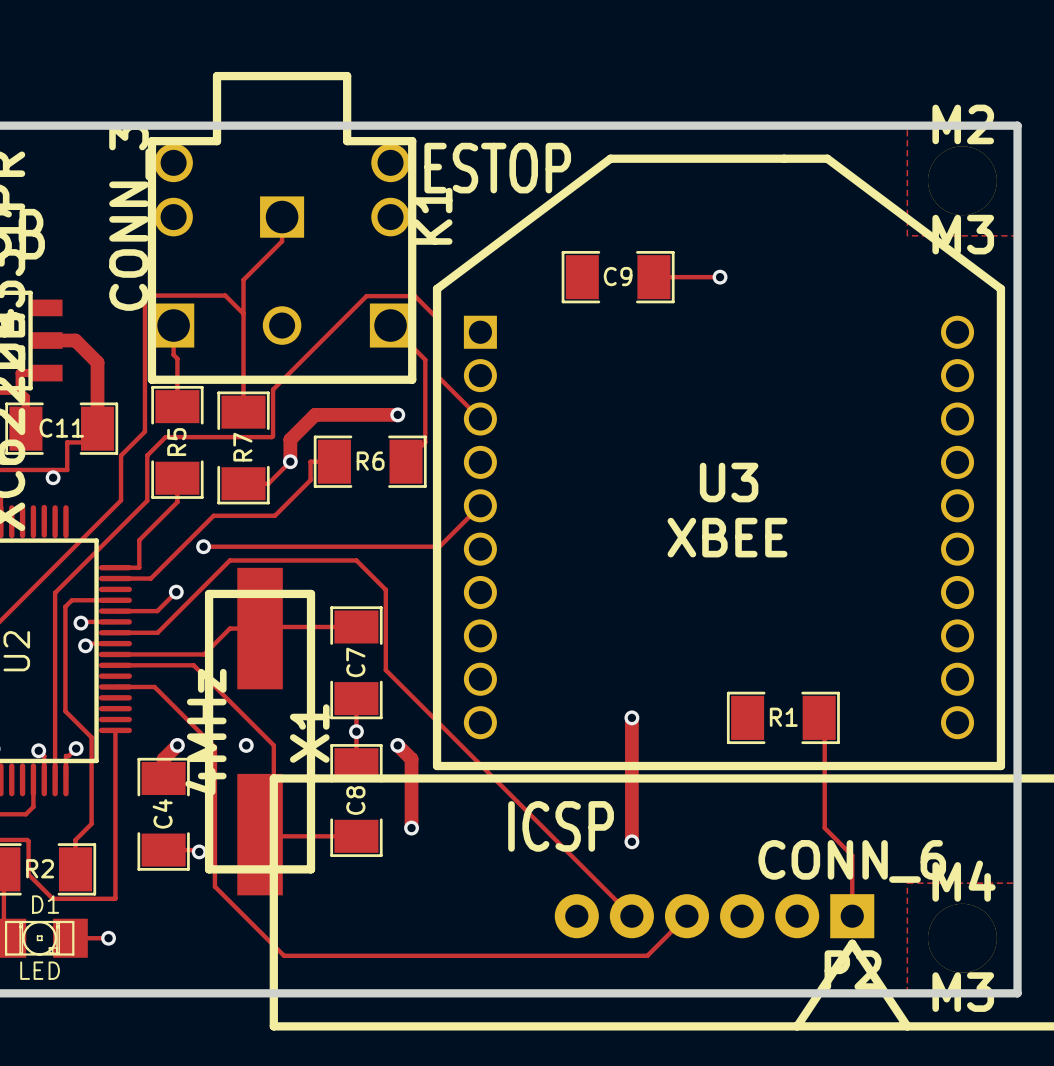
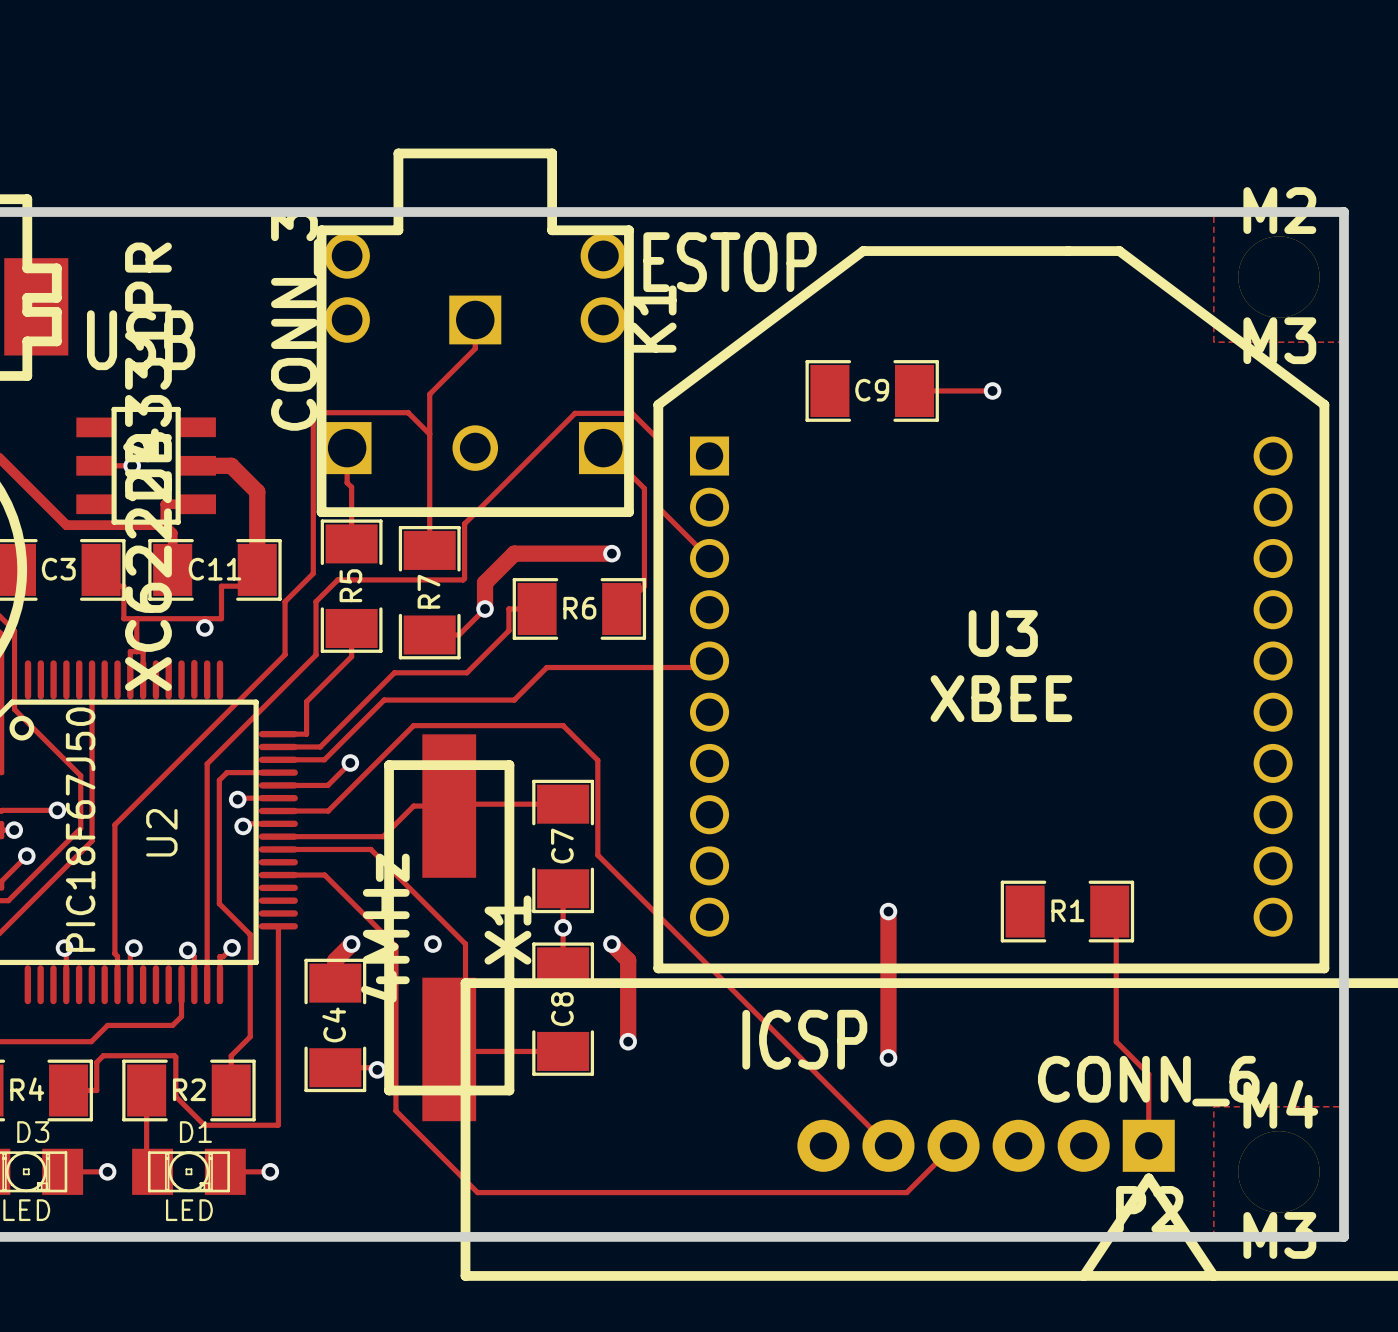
track: (480, 505) (439, 546) (203, 546) -> (709, 661) (693, 667) (546, 667) (514, 700) (384, 700) (324, 759) (278, 759)
via: (203, 546) -> none

